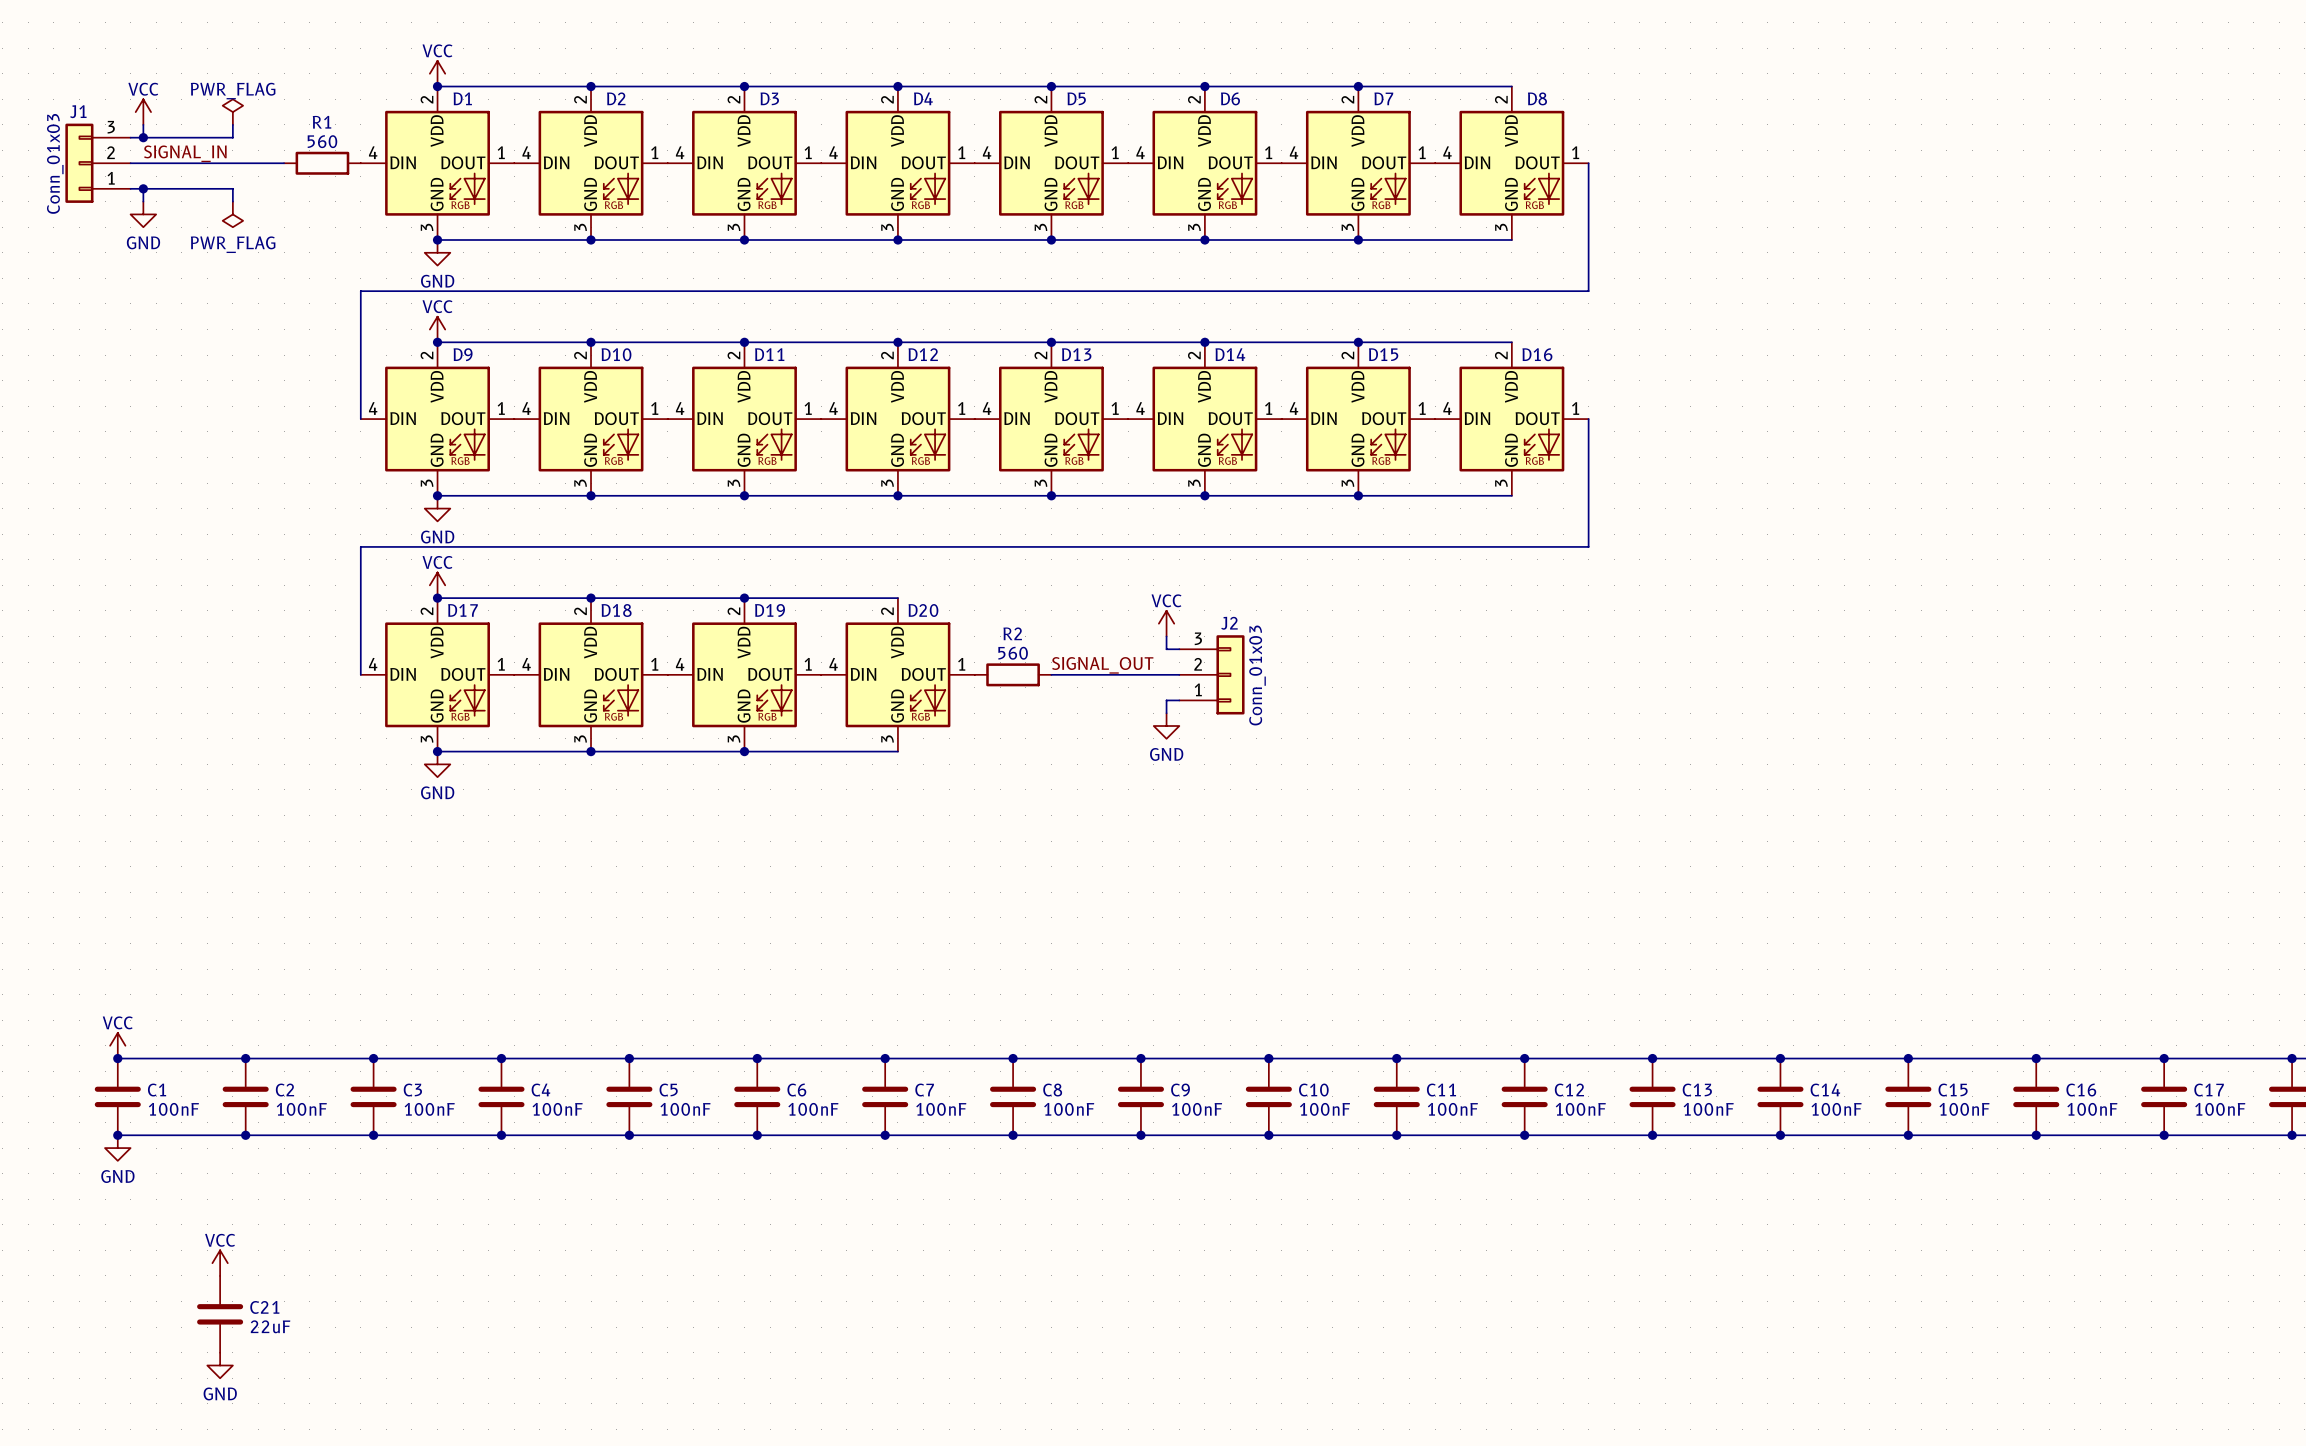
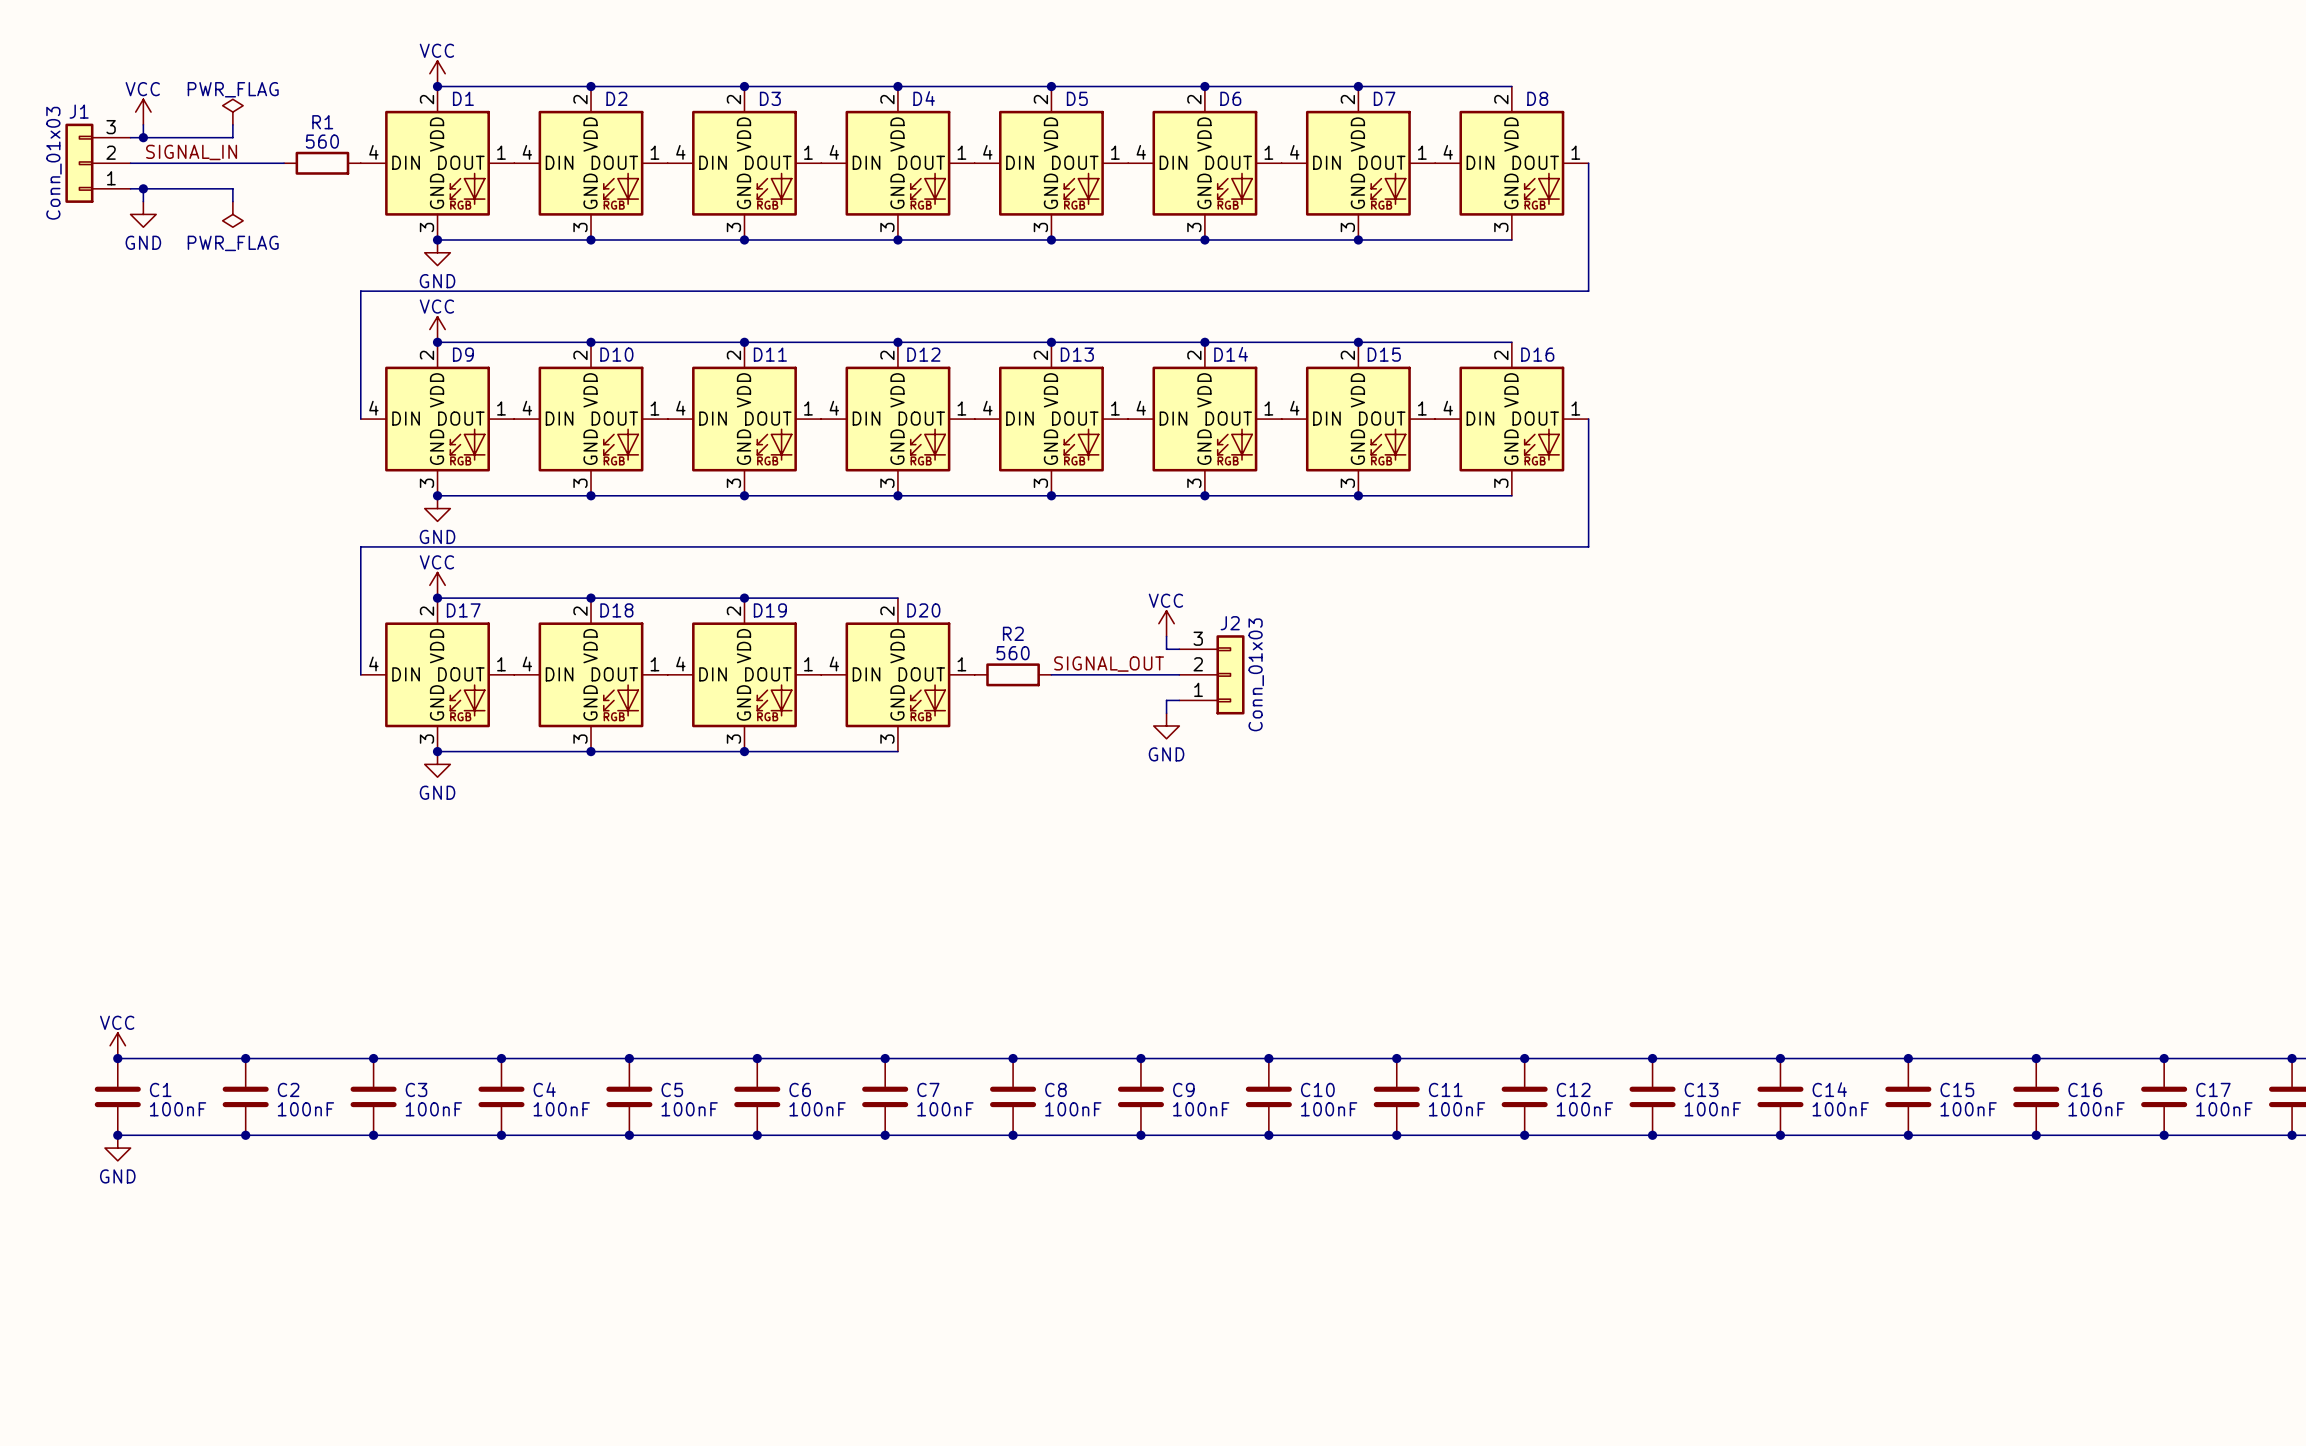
power symbol: VCC (220, 1263) -> none
C21: 22uF (220, 1314) -> none
power symbol: GND (220, 1365) -> none

